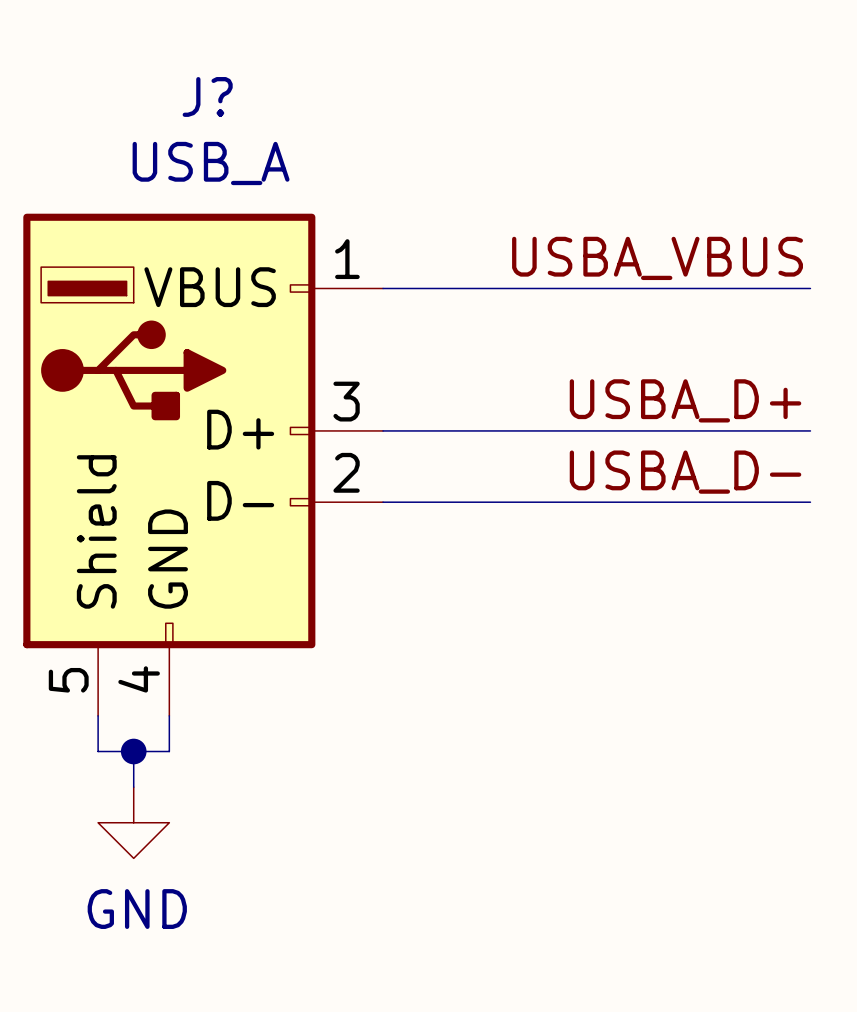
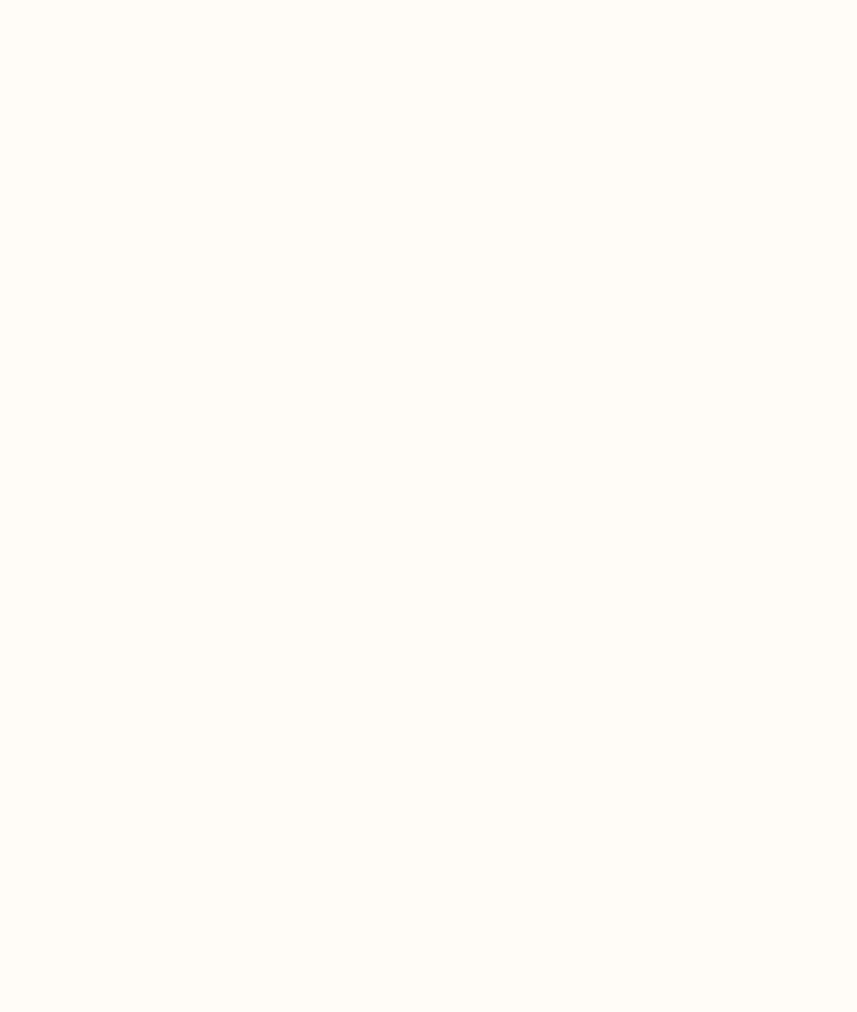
label: USBA_VBUS (657, 258) -> none
wire: (383, 288) (810, 288) -> none
label: USBA_D+ (685, 400) -> none
wire: (383, 430) (810, 430) -> none
J?: USB_A (203, 464) -> none
label: USBA_D- (685, 472) -> none
wire: (383, 502) (810, 502) -> none
wire: (98, 715) (98, 751) (169, 751) (169, 715) -> none
wire: (133, 751) (133, 787) -> none
junction: (133, 751) -> none
power symbol: GND (133, 822) -> none

